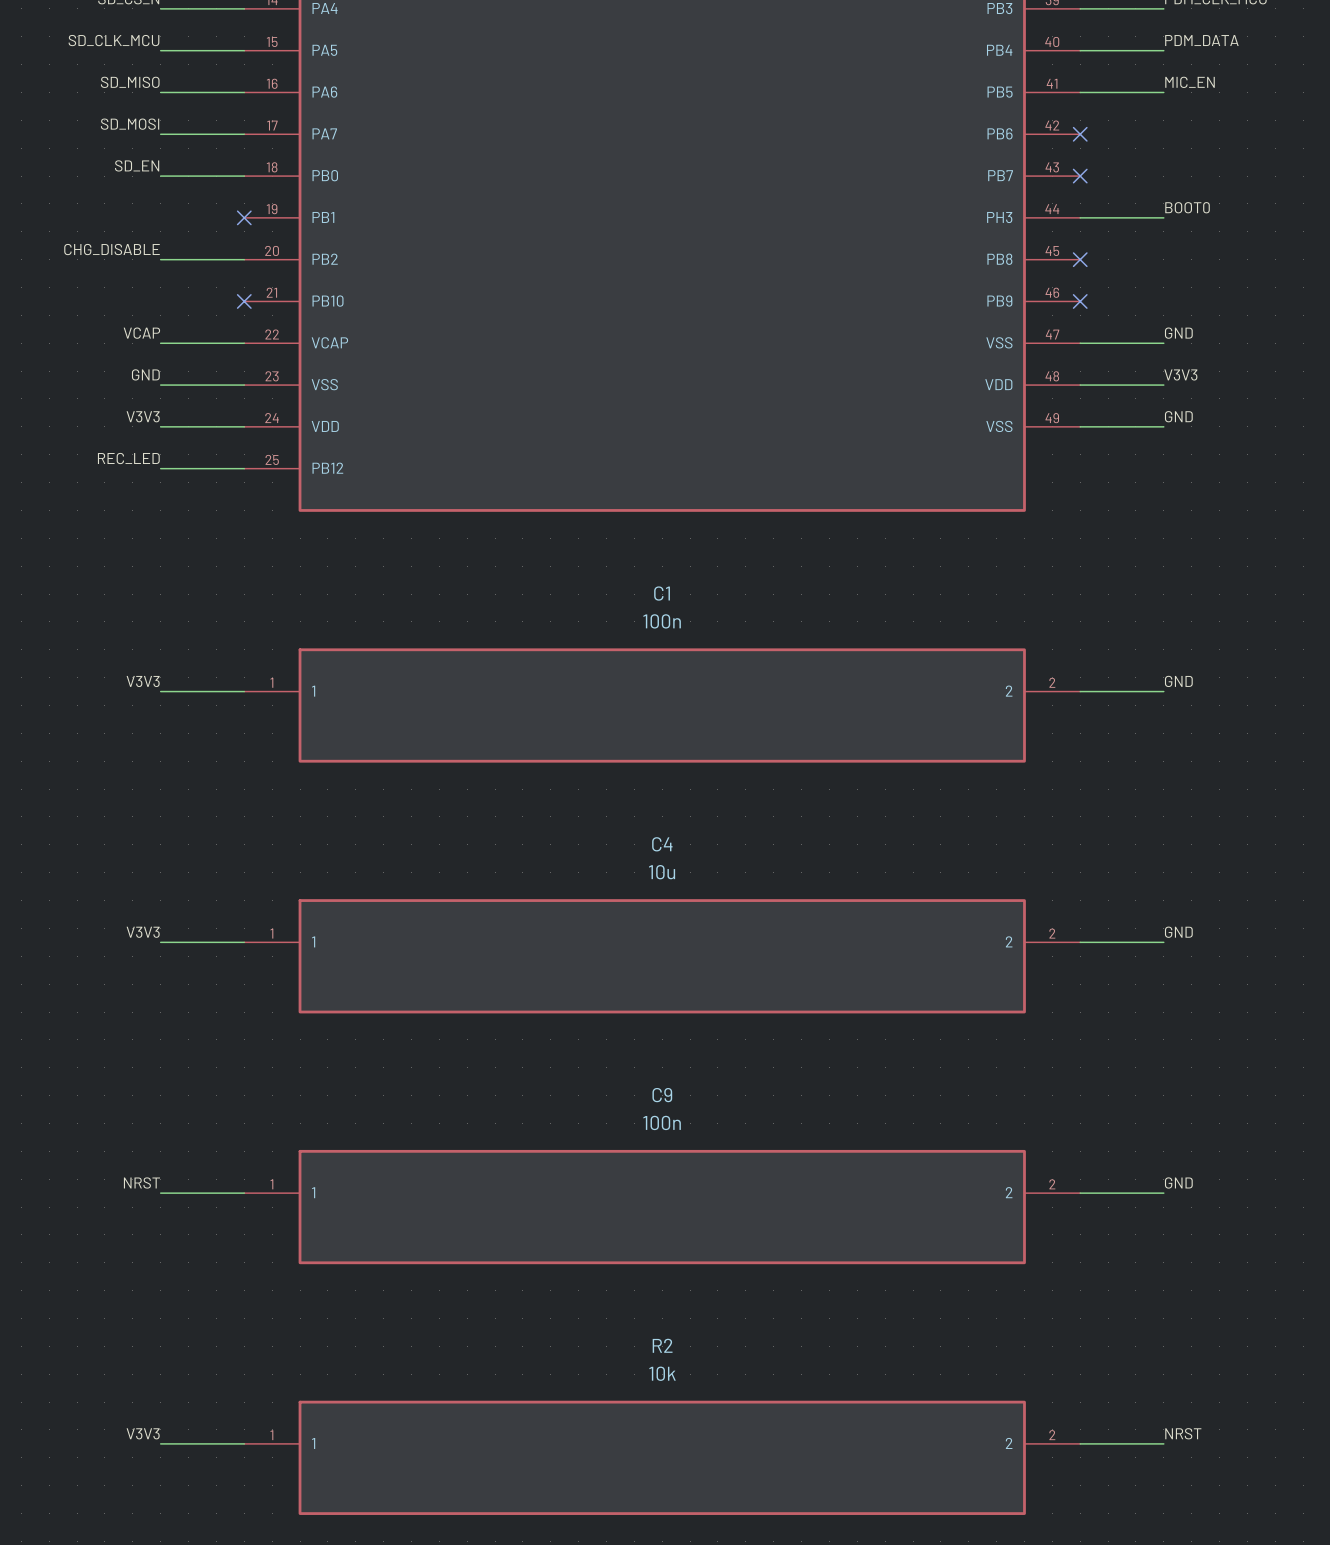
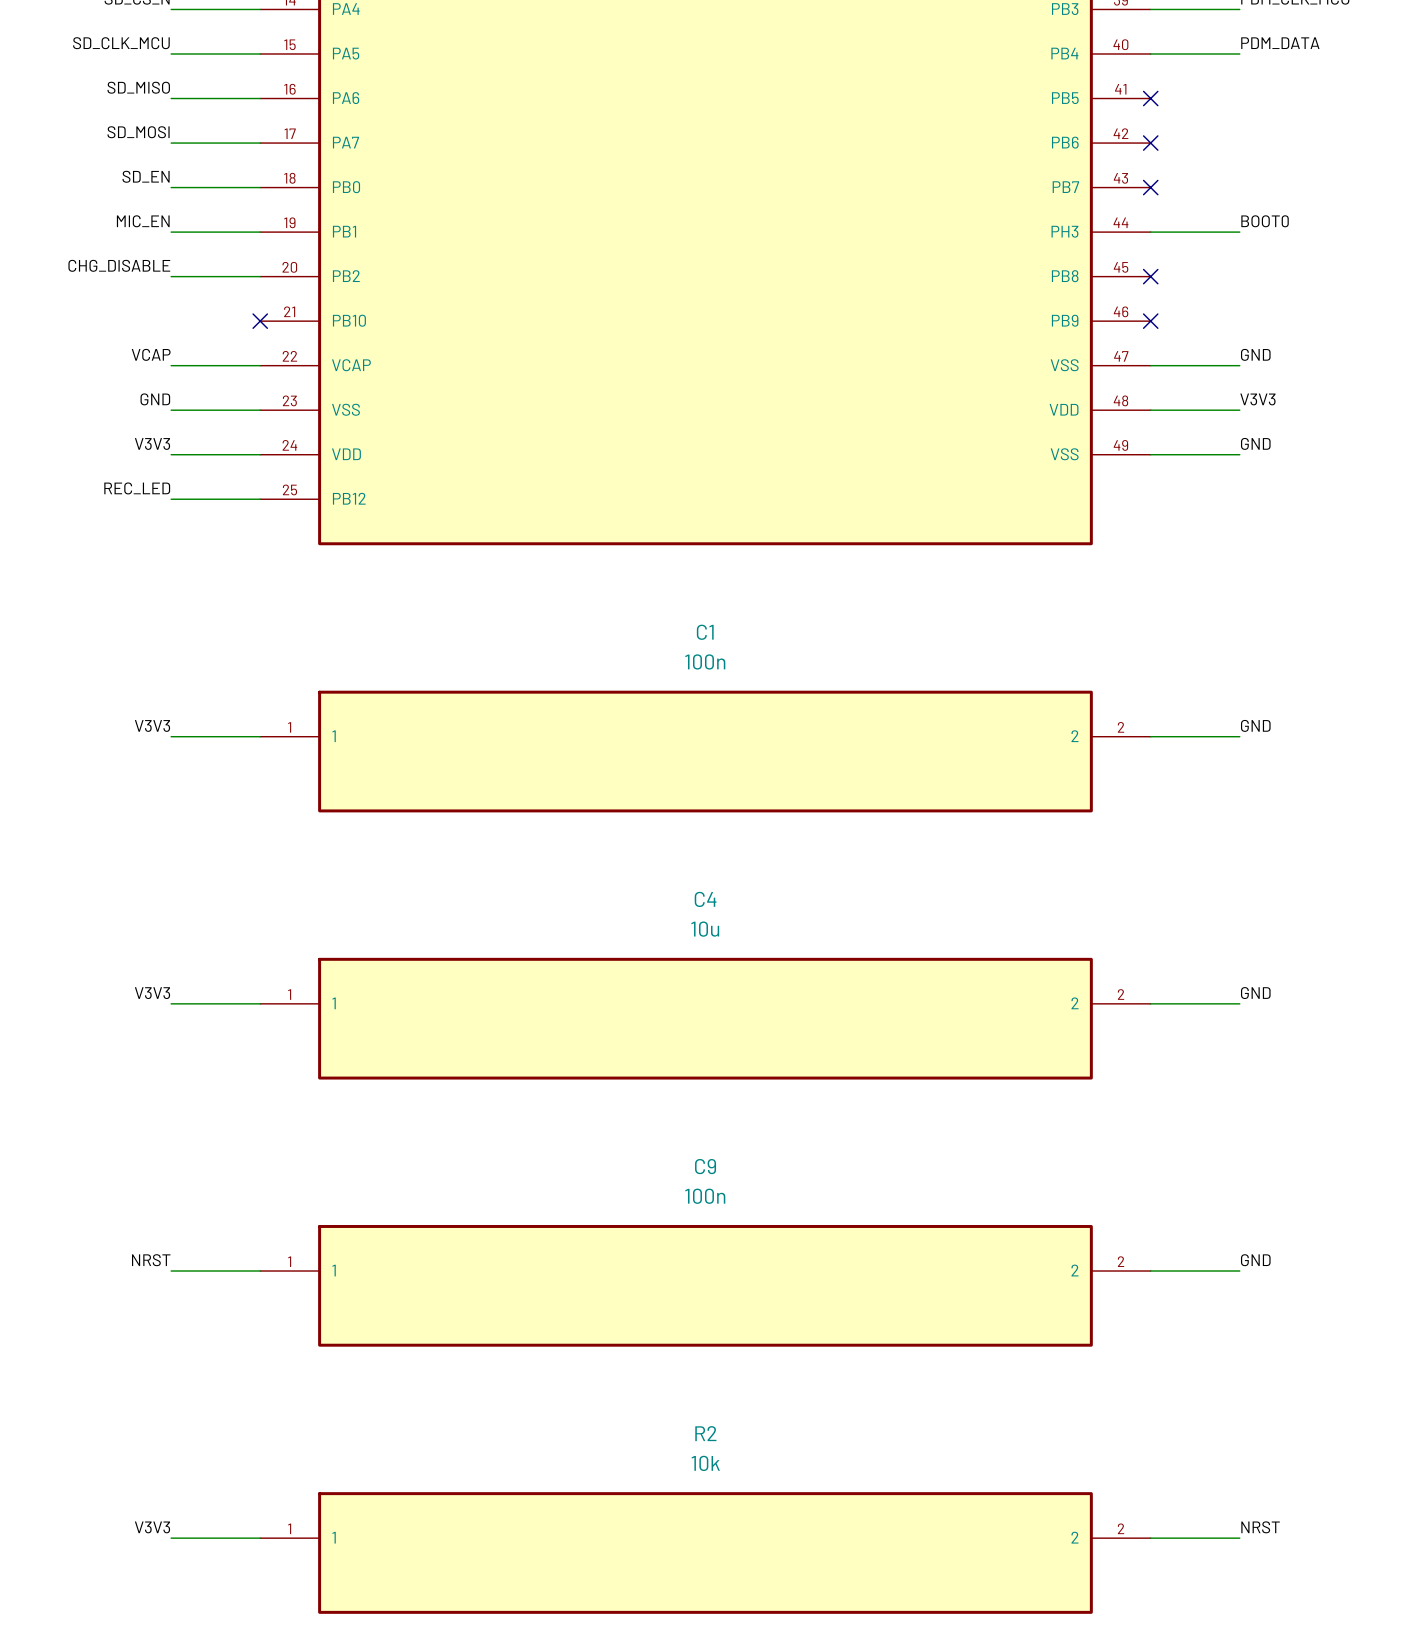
label: MIC_EN (1190, 82) -> none
wire: (1080, 92) (1163, 92) -> none
no-connect mark: none -> (1150, 98)
label: none -> MIC_EN (143, 221)
wire: none -> (171, 232) (260, 232)
no-connect mark: (244, 217) -> none

